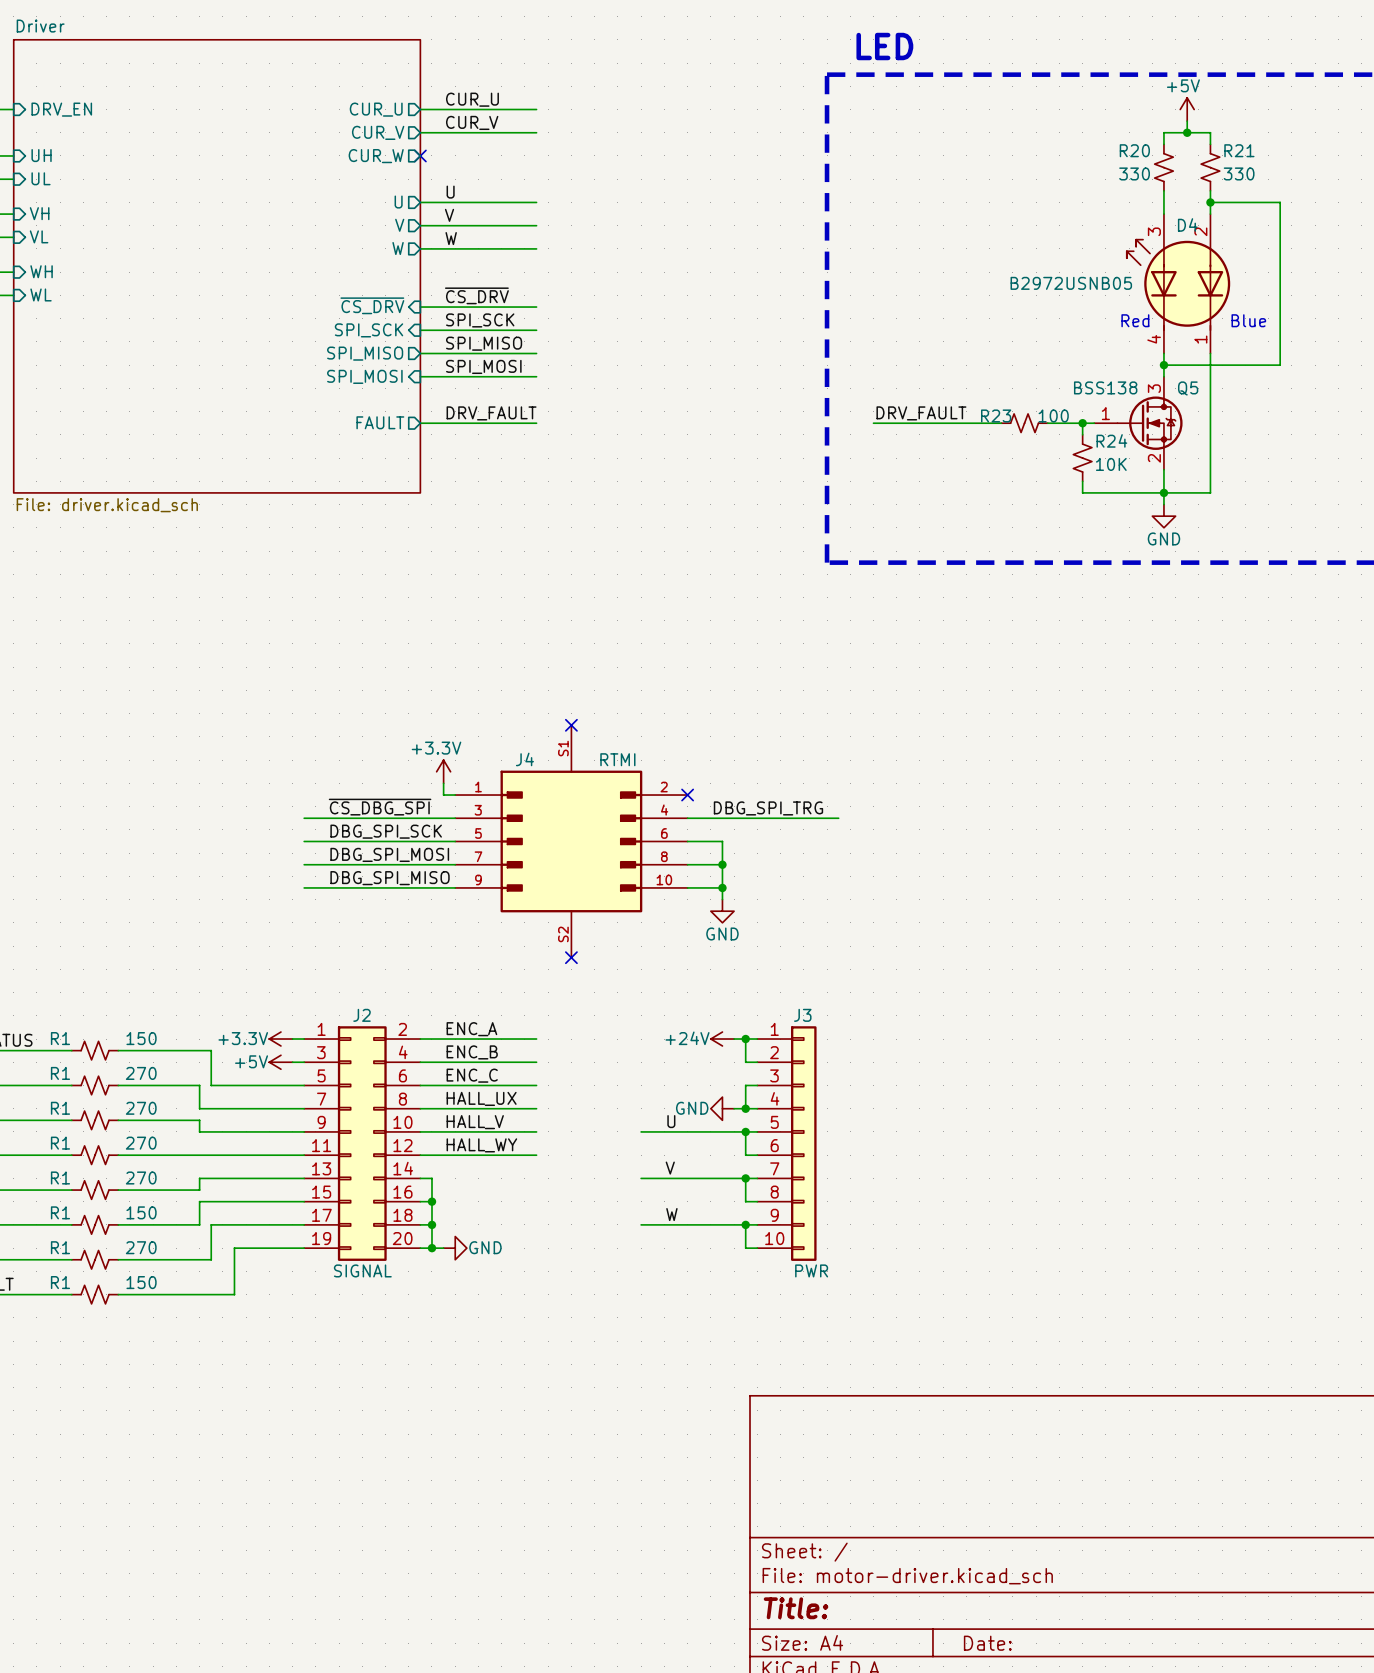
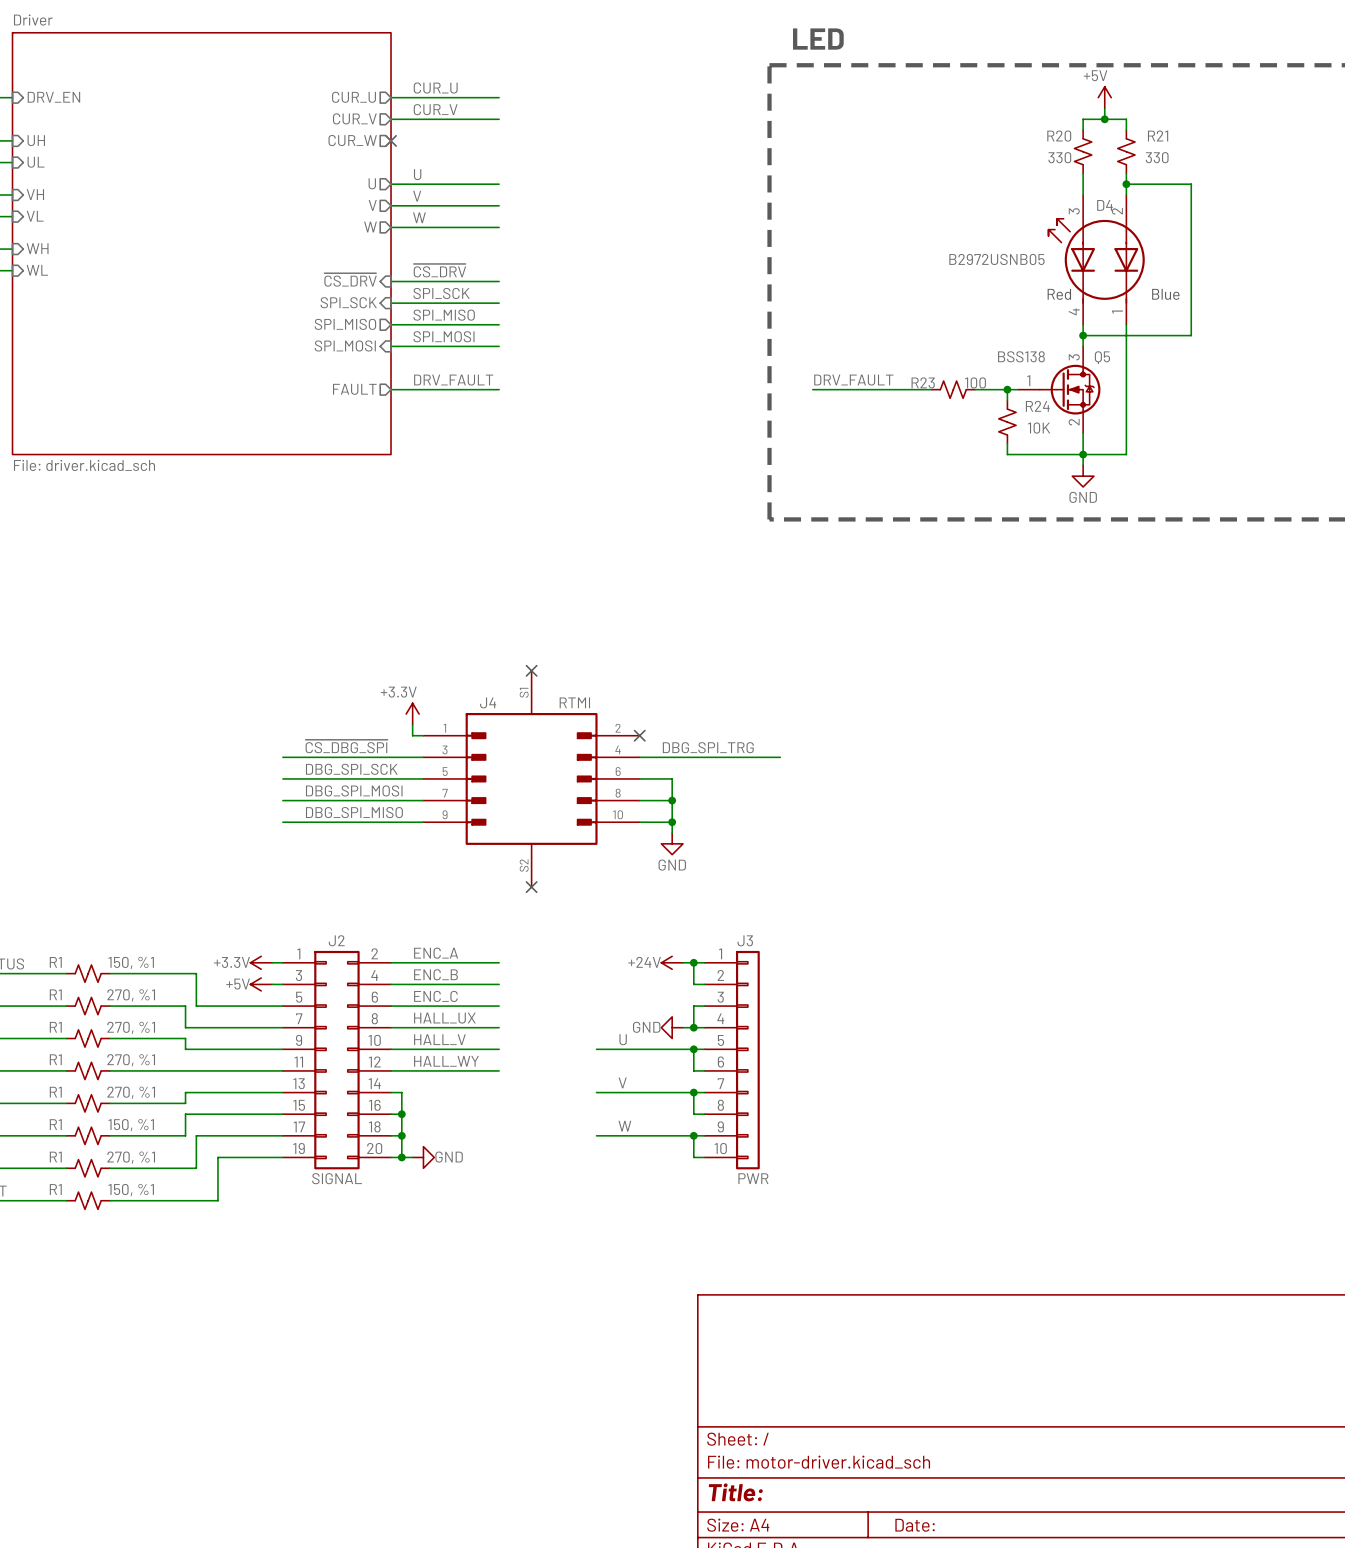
R1 value: 150 (141, 1038) -> 150, %1 (131, 962)
R1 value: 270 (141, 1073) -> 270, %1 (131, 995)
R1 value: 270 (141, 1108) -> 270, %1 (131, 1027)
R1 value: 270 (141, 1143) -> 270, %1 (131, 1060)
R1 value: 270 (141, 1178) -> 270, %1 (131, 1092)
R1 value: 150 (141, 1212) -> 150, %1 (131, 1125)
R1 value: 270 (141, 1247) -> 270, %1 (131, 1157)
R1 value: 150 (141, 1282) -> 150, %1 (131, 1190)

